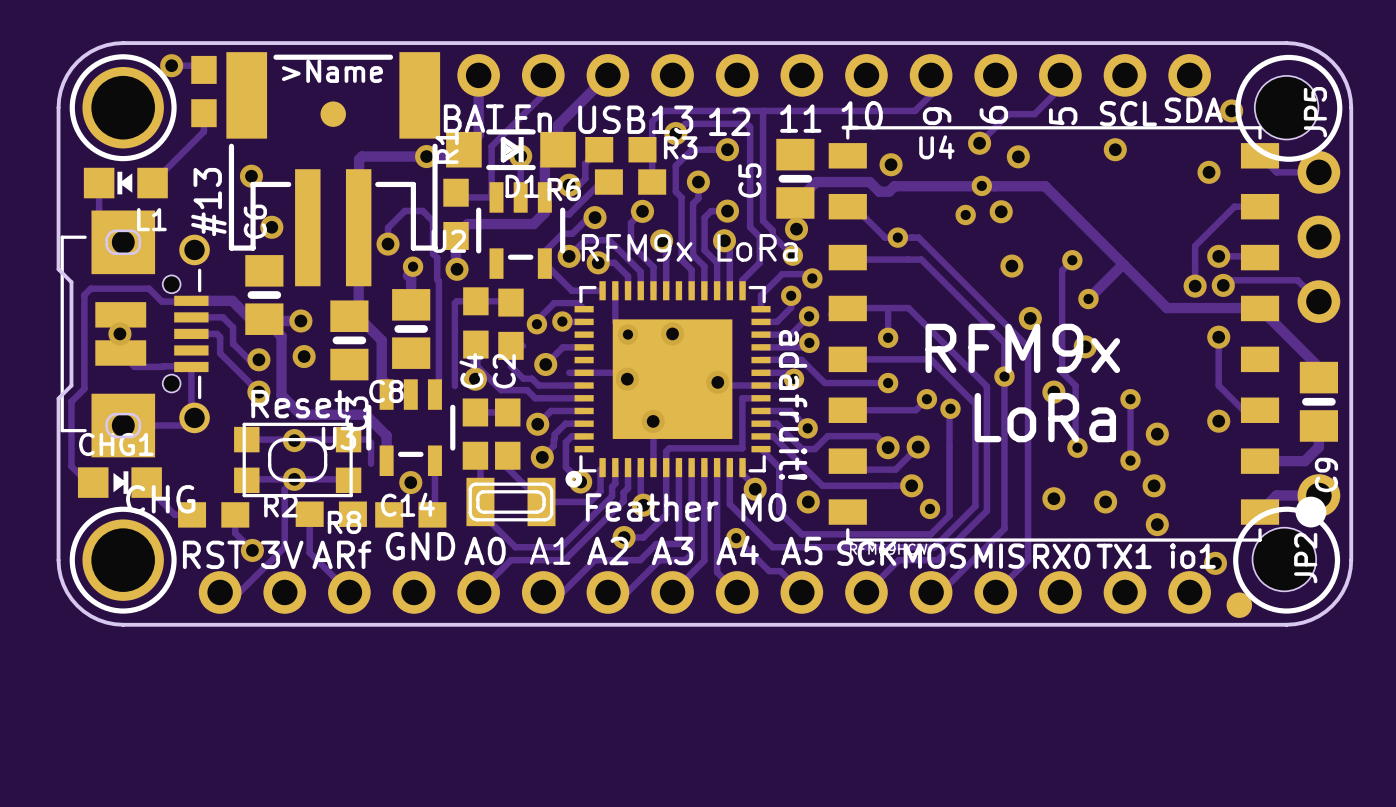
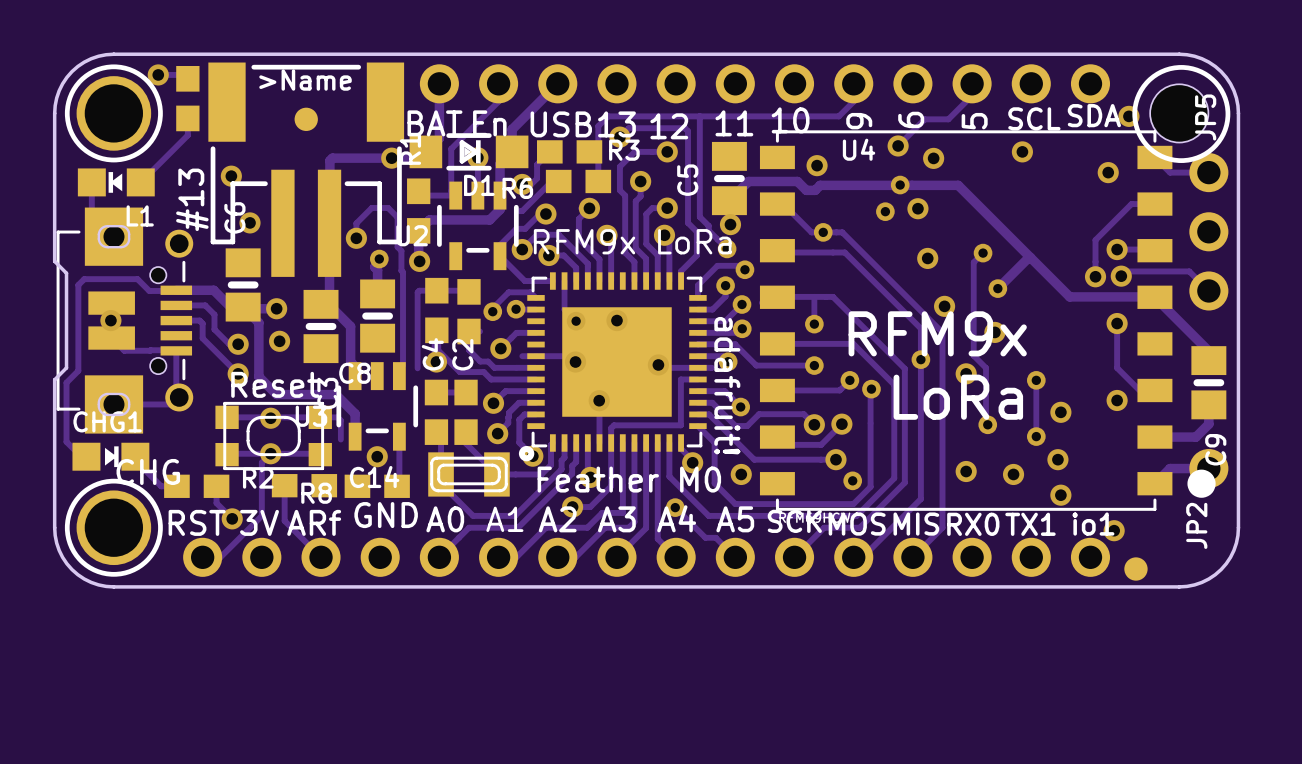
part: (1286, 560) -> none

